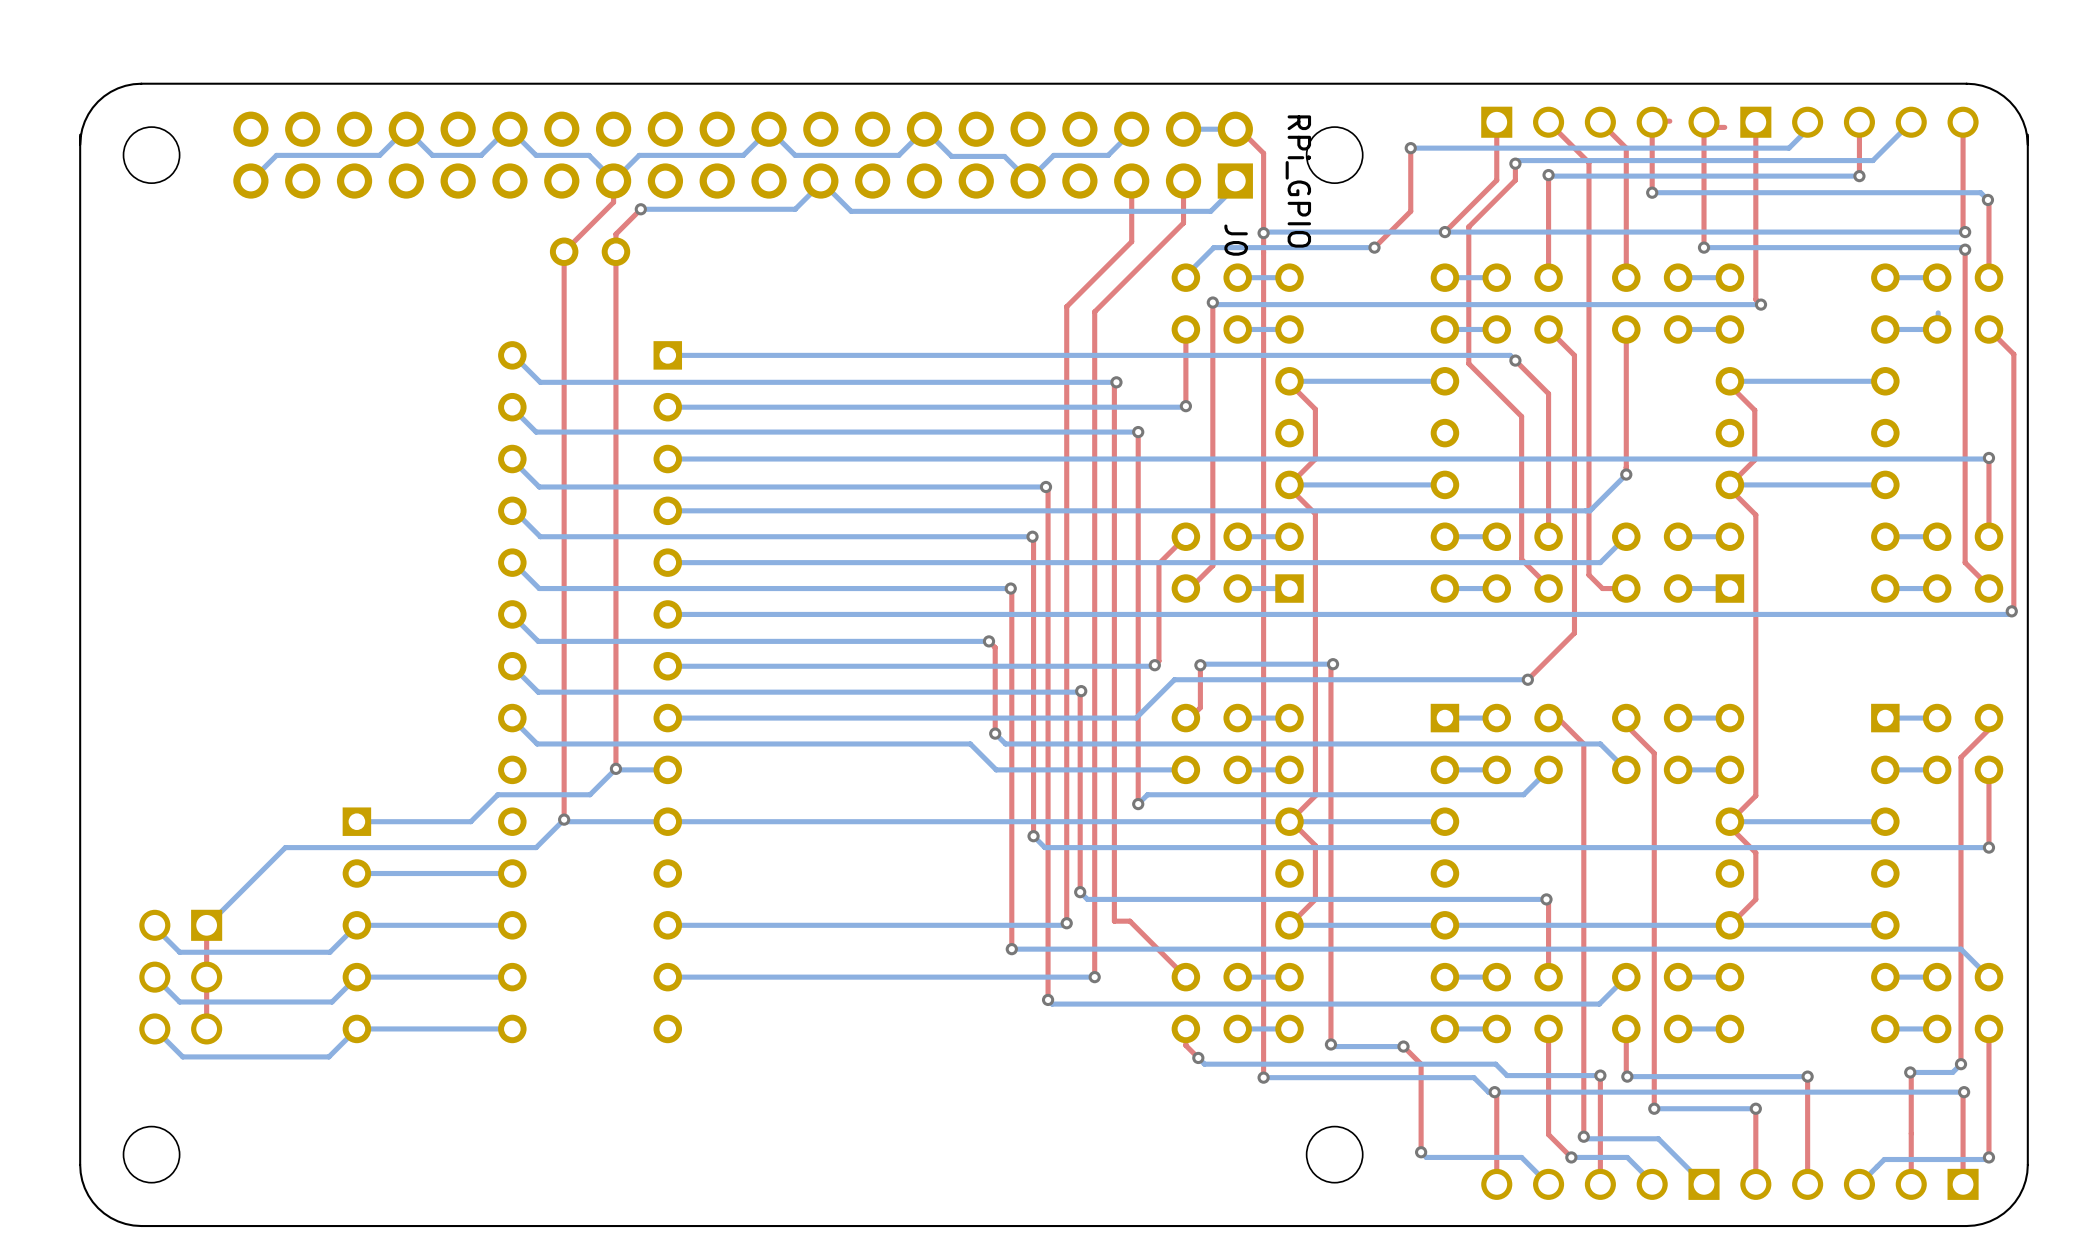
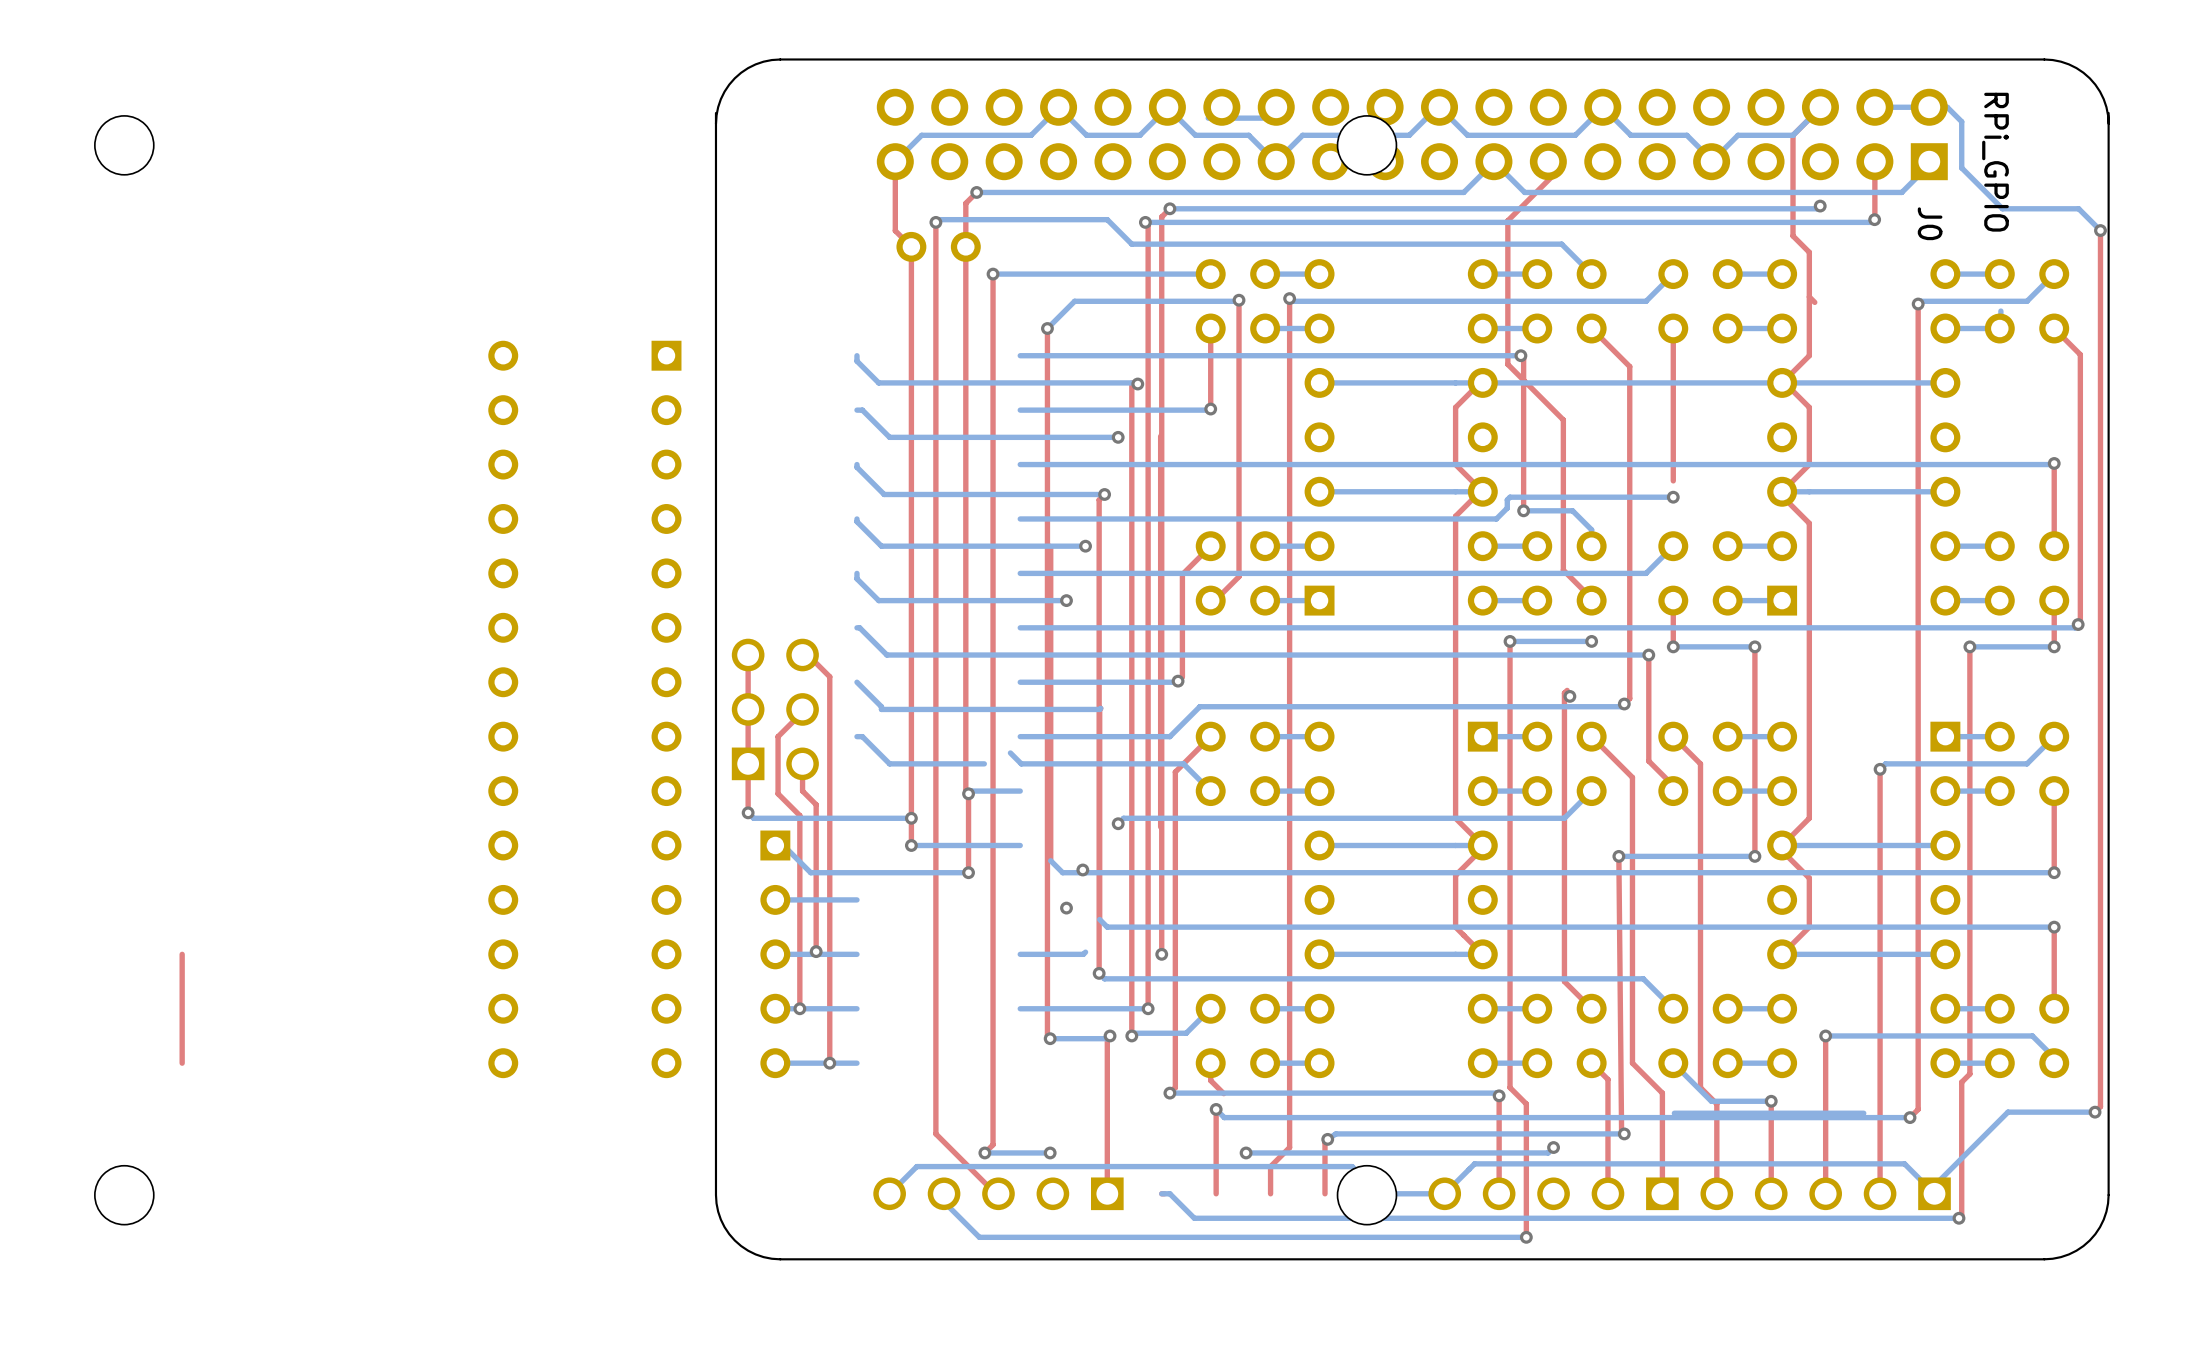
bottom track: none -> (1820, 107) (1793, 135) (1737, 135) (1711, 161) (1686, 135) (1630, 135) (1602, 107) (1575, 135) (1467, 135) (1437, 107) (1409, 135) (1302, 135) (1276, 161) (1248, 135) (1195, 135) (1167, 107) (1139, 135) (1086, 135) (1058, 107) (1031, 135) (921, 135) (895, 161)
bottom track: none -> (1874, 107) (1947, 107) (1961, 121) (1961, 167) (2002, 208) (2078, 208) (2100, 230)
top track: (1669, 121) (1652, 122) (1652, 192) -> none
top track: (1496, 122) (1496, 180) (1444, 232) -> none
top track: (1548, 122) (1588, 162) (1588, 575) (1602, 588) (1626, 588) -> (1673, 646) (1673, 600)
top track: (1600, 122) (1626, 148) (1626, 277) -> none
part: (1600, 122) -> none
top track: (1755, 122) (1755, 256) -> (1820, 107) (1793, 135) (1793, 235) (1809, 252)
bottom track: (1807, 122) (1807, 129) (1788, 148) (1410, 148) -> none
top track: (1859, 122) (1859, 176) -> none
part: (1859, 122) -> none
bottom track: (1911, 122) (1872, 160) (1518, 160) (1515, 163) -> none
top track: (1963, 122) (1963, 230) (1965, 232) -> none
board edge: none -> (2108, 113) (2108, 1195) (2103, 1219) (2089, 1240) (2068, 1254) (2044, 1259) (780, 1259) (763, 1257) (741, 1246) (724, 1227) (718, 1211) (715, 1195) (715, 113)
top track: (1724, 127) (1709, 127) (1704, 122) (1704, 247) -> none
bottom track: (1131, 129) (1131, 131) (1108, 155) (1053, 155) (1028, 181) (1004, 156) (951, 156) (924, 129) (898, 155) (795, 155) (769, 129) (743, 155) (639, 155) (613, 181) (589, 155) (536, 155) (509, 129) (507, 129) (481, 155) (432, 155) (405, 129) (379, 155) (276, 155) (250, 181) -> none
top track: (1235, 129) (1239, 129) (1263, 153) (1263, 1077) -> none
board edge: (2027, 134) (2027, 1164) (2023, 1188) (2009, 1208) (1990, 1221) (1966, 1226) (141, 1226) (125, 1223) (110, 1217) (98, 1208) (88, 1195) (82, 1180) (80, 1164) (80, 134) -> none
board edge: none -> (2108, 123) (2103, 99) (2089, 78) (2068, 64) (2044, 59) (780, 59) (755, 64) (734, 78) (720, 99) (715, 123)
board edge: (2027, 144) (2023, 121) (2009, 101) (1990, 88) (1966, 83) (141, 83) (117, 88) (98, 101) (84, 121) (80, 144) -> none
top track: (1410, 148) (1410, 211) (1374, 247) -> none
via: (1410, 148) -> none
J0 position: (743, 155) -> (1412, 134)
via: (1515, 163) -> none
top track: none -> (895, 161) (895, 230) (911, 246) (911, 845)
top track: none -> (1874, 161) (1874, 219)
bottom track: none -> (1929, 161) (1929, 165) (1901, 192) (1524, 192) (1493, 161) (1463, 192) (976, 192)
top track: (1548, 175) (1548, 277) -> none
bottom track: (1548, 175) (1859, 176) -> none
via: (1548, 175) -> none
via: (1859, 176) -> none
top track: (613, 181) (613, 202) (564, 251) (564, 819) -> none
top track: (1131, 181) (1131, 241) (1066, 306) (1066, 923) -> none
top track: (1183, 181) (1183, 223) (1094, 311) (1094, 977) -> none
bottom track: (1235, 181) (1235, 186) (1210, 211) (851, 211) (820, 181) (820, 183) (795, 209) (640, 209) -> none
bottom track: (1652, 192) (1980, 192) (1987, 199) -> none
via: (1652, 192) -> none
top track: none -> (976, 192) (965, 203) (965, 791) (968, 793) (968, 872)
via: none -> (976, 192)
top track: (1987, 199) (1988, 277) -> none
via: (1987, 199) -> none
top track: (640, 209) (615, 234) (615, 768) -> none
via: (640, 209) -> none
bottom track: none -> (1820, 206) (1817, 208) (1169, 208)
via: none -> (1820, 206)
top track: none -> (1169, 208) (1161, 216) (1161, 954)
via: none -> (1169, 208)
bottom track: none -> (1874, 219) (1871, 222) (1145, 222)
via: none -> (1874, 219)
top track: none -> (935, 222) (935, 1133) (995, 1193) (998, 1193)
bottom track: none -> (935, 222) (938, 219) (1107, 219) (1131, 244) (1561, 244) (1591, 274)
via: none -> (935, 222)
top track: none -> (1145, 222) (1148, 225) (1148, 1008)
via: none -> (1145, 222)
via: (1444, 232) -> none
bottom track: (1965, 232) (1263, 233) -> none
via: (1965, 232) -> none
via: (1263, 233) -> none
top track: none -> (2100, 230) (2100, 1106) (2095, 1112)
via: none -> (2100, 230)
bottom track: (1374, 247) (1213, 247) (1185, 277) -> (993, 274) (1210, 274)
via: (1374, 247) -> none
bottom track: (1704, 247) (1963, 247) (1965, 249) -> none
via: (1704, 247) -> none
top track: (1965, 249) (1965, 562) (1988, 588) -> (2054, 646) (2054, 600)
via: (1965, 249) -> none
part position: (590, 251) -> (938, 246)
top track: none -> (993, 274) (993, 1144) (984, 1152)
via: none -> (993, 274)
bottom track: none -> (1673, 274) (1646, 301) (1292, 301) (1289, 298)
bottom track: none -> (2054, 274) (2027, 301) (1920, 301) (1918, 304)
top track: none -> (1289, 298) (1289, 1147) (1270, 1166) (1270, 1193)
via: none -> (1289, 298)
bottom track: (1212, 302) (1214, 304) (1761, 304) -> none
bottom track: none -> (1240, 301) (1074, 301) (1047, 328)
via: (1761, 304) -> none
top track: none -> (1918, 304) (1918, 1109) (1910, 1117)
via: none -> (1918, 304)
top track: none -> (1047, 328) (1047, 1035) (1050, 1038)
via: none -> (1047, 328)
bottom track: (512, 355) (540, 382) (1116, 382) -> none
bottom track: none -> (856, 355) (856, 361) (878, 382) (1131, 382)
bottom track: (1004, 355) (667, 355) -> none
top track: none -> (1520, 355) (1523, 358) (1523, 510)
bottom track: (1481, 355) (1510, 355) (1515, 360) -> none
top track: (1574, 355) (1574, 633) (1527, 679) -> (1618, 355) (1629, 366) (1629, 698) (1624, 704)
top track: (1515, 360) (1548, 393) (1548, 536) -> none
via position: (1515, 360) -> (1520, 355)
top track: none -> (1131, 382) (1131, 1035)
top track: (1289, 381) (1315, 409) (1315, 459) (1289, 484) (1289, 488) (1315, 513) (1315, 795) (1289, 821) (1315, 845) (1315, 899) (1289, 925) -> none
top track: none -> (1482, 382) (1480, 382) (1455, 407) (1455, 464) (1482, 491) (1480, 491) (1455, 516) (1455, 818) (1482, 845) (1482, 848) (1455, 875) (1455, 927) (1482, 954)
top track: (1729, 381) (1729, 385) (1754, 410) (1754, 460) -> (1809, 296) (1809, 355) (1782, 382) (1784, 382) (1809, 407) (1808, 465)
bottom track: none -> (1782, 382) (1482, 382)
top track: (1116, 382) (1114, 384) (1114, 921) (1129, 921) (1185, 977) -> none
bottom track: (512, 407) (536, 432) (1138, 432) -> none
bottom track: (849, 407) (667, 407) -> none
bottom track: (1004, 407) (854, 407) -> (1118, 437) (889, 437) (862, 410)
via: (1138, 432) -> none
via: none -> (1118, 437)
bottom track: (512, 459) (539, 486) (1045, 486) -> none
bottom track: none -> (856, 464) (856, 467) (884, 494) (1104, 494)
bottom track: (1004, 459) (667, 459) -> none
bottom track: (1626, 474) (1590, 510) (1457, 510) -> (1673, 497) (1510, 497) (1507, 499) (1507, 508) (1496, 518)
via position: (1626, 474) -> (1673, 497)
top track: (1045, 486) (1048, 489) (1048, 999) -> none
via: (1045, 486) -> none
top track: none -> (1104, 494) (1099, 499) (1099, 973)
via: none -> (1104, 494)
bottom track: none -> (1523, 510) (1572, 510) (1591, 529) (1591, 546)
via: none -> (1523, 510)
bottom track: (512, 510) (540, 536) (872, 536) -> (856, 518) (856, 521) (881, 546)
bottom track: (1004, 510) (667, 510) -> none
via: (1032, 536) -> none
bottom track: none -> (1085, 546) (1049, 546)
via: none -> (1085, 546)
bottom track: (512, 562) (539, 588) (869, 588) -> (856, 573) (856, 578) (878, 600)
bottom track: (1004, 562) (667, 562) -> none
top track: (1010, 588) (1011, 949) -> none
via: (1010, 588) -> none
bottom track: none -> (1066, 600) (1026, 600)
via: none -> (1066, 600)
bottom track: (512, 614) (538, 641) (989, 641) -> none
bottom track: (849, 614) (667, 614) -> none
bottom track: (1004, 614) (851, 614) -> (1648, 655) (886, 655) (859, 627)
top track: none -> (1510, 641) (1510, 1087) (1526, 1103) (1526, 1237)
via: none -> (1510, 641)
bottom track: none -> (1591, 641) (1510, 641)
via: none -> (1591, 641)
via: none -> (1673, 646)
top track: none -> (1754, 646) (1754, 856)
bottom track: none -> (1754, 646) (1673, 646)
via: none -> (1754, 646)
top track: none -> (1969, 646) (1969, 1074) (1961, 1082) (1961, 1215) (1958, 1218)
via: none -> (1969, 646)
bottom track: none -> (2054, 646) (1969, 646)
via: none -> (2054, 646)
top track: none -> (748, 655) (748, 812)
top track: none -> (802, 655) (808, 655) (829, 676) (829, 1063)
top track: none -> (1648, 655) (1648, 761) (1673, 785) (1673, 791)
via: none -> (1648, 655)
top track: (989, 641) (995, 647) (995, 733) -> none
via: (989, 641) -> none
top track: (1333, 664) (1330, 666) (1330, 1044) -> none
bottom track: (1333, 664) (1200, 665) -> none
via: (1333, 664) -> none
top track: (1200, 665) (1200, 707) (1190, 718) (1185, 718) -> (1169, 1093) (1175, 1087) (1175, 772) (1210, 736)
via: (1200, 665) -> none
bottom track: (512, 666) (538, 692) (872, 692) -> (856, 682) (881, 706) (881, 709)
bottom track: (1004, 666) (667, 666) -> none
bottom track: (1527, 679) (1174, 679) (1136, 718) -> (1624, 704) (1621, 706) (1199, 706) (1169, 736) (1158, 736)
via: none -> (1624, 704)
via: (1081, 691) -> none
part: none -> (775, 709)
top track: none -> (802, 709) (802, 712) (778, 736) (778, 793) (799, 815) (799, 1008)
bottom track: (512, 718) (537, 743) (880, 743) -> none
bottom track: (849, 718) (667, 718) -> none
bottom track: (1004, 718) (854, 718) -> (889, 763) (862, 736)
top track: (1548, 718) (1557, 718) (1583, 743) (1583, 1136) -> (1591, 736) (1632, 777) (1632, 1063) (1662, 1093) (1662, 1193)
top track: (1626, 718) (1626, 725) (1654, 753) (1654, 1108) -> (1673, 736) (1700, 763) (1700, 1087) (1716, 1103) (1716, 1193)
top track: (1988, 718) (1988, 729) (1960, 757) (1960, 1064) -> none
bottom track: none -> (2054, 736) (2027, 763) (1885, 763) (1880, 769)
via: (995, 733) -> none
top track: none -> (802, 763) (802, 791) (816, 804) (816, 951)
bottom track: (970, 743) (996, 769) -> (968, 793) (971, 791) (1011, 791)
bottom track: (1159, 743) (1600, 743) (1626, 769) -> none
top track: none -> (1880, 769) (1880, 1193)
via: none -> (1880, 769)
via: (615, 768) -> none
bottom track: (667, 769) (615, 768) (590, 794) (497, 794) (470, 821) (356, 821) -> none
bottom track: (1185, 769) (1004, 769) -> (1210, 791) (1183, 763)
via: none -> (968, 793)
bottom track: none -> (748, 812) (753, 818) (911, 818)
via: none -> (748, 812)
bottom track: (1523, 794) (1147, 794) (1138, 804) -> (1565, 817) (1123, 818) (1118, 823)
via: none -> (911, 818)
via: none -> (1118, 823)
via: (1138, 804) -> none
via: (564, 819) -> none
bottom track: (771, 821) (566, 821) (564, 819) (536, 847) (285, 847) (206, 925) -> none
bottom track: (900, 821) (779, 821) -> (968, 872) (810, 872) (783, 845)
via: none -> (911, 845)
bottom track: (1289, 821) (1004, 821) -> none
top track: none -> (1618, 856) (1621, 1131) (1624, 1133)
bottom track: none -> (1754, 856) (1618, 856)
via: none -> (1754, 856)
via: (1033, 836) -> none
via: none -> (1082, 869)
via: none -> (968, 872)
bottom track: (512, 873) (356, 873) -> none
bottom track: none -> (856, 899) (775, 899)
via: none -> (1066, 908)
via: (1080, 892) -> none
top track: (1546, 899) (1548, 901) (1548, 977) -> (1567, 690) (1564, 693) (1564, 981) (1591, 1008)
via position: (1546, 899) -> (1618, 856)
top track: none -> (2054, 927) (2054, 1008)
bottom track: none -> (2054, 927) (1589, 927)
via: none -> (2054, 927)
via: none -> (816, 951)
via: (1066, 923) -> none
part position: (356, 925) -> (775, 954)
bottom track: (512, 925) (356, 925) (329, 952) (179, 952) (154, 925) -> none
bottom track: (771, 925) (667, 925) -> none
bottom track: (1004, 925) (849, 925) -> none
via: none -> (1161, 954)
bottom track: (1729, 925) (1444, 925) -> none
via: none -> (1099, 973)
via: (1011, 949) -> none
bottom track: (1011, 950) (1960, 949) (1988, 977) -> none
part: (180, 977) -> none
bottom track: (512, 977) (356, 977) (332, 1002) (179, 1002) (154, 977) -> none
bottom track: (771, 977) (667, 977) -> none
via: none -> (799, 1008)
bottom track: (1004, 977) (849, 977) -> none
via: (1094, 977) -> none
bottom track: none -> (1148, 1008) (1114, 1008)
via: none -> (1148, 1008)
bottom track: none -> (1210, 1008) (1186, 1033) (1134, 1033) (1131, 1035)
bottom track: (1626, 977) (1599, 1004) (1052, 1004) (1048, 999) -> (1673, 1008) (1643, 978) (1104, 978) (1099, 973)
via position: (1048, 999) -> (1050, 1038)
top track: none -> (1110, 1035) (1107, 1038) (1107, 1193)
bottom track: none -> (1110, 1035) (1107, 1038) (1050, 1038)
via: none -> (1110, 1035)
via: none -> (1131, 1035)
top track: none -> (1825, 1035) (1825, 1193)
bottom track: none -> (1825, 1035) (2032, 1035) (2054, 1057) (2054, 1063)
via: none -> (1825, 1035)
bottom track: (512, 1028) (356, 1028) (328, 1056) (182, 1056) (154, 1028) -> none
via: none -> (829, 1063)
bottom track: none -> (856, 1063) (775, 1063)
top track: (1548, 1028) (1548, 1134) (1571, 1157) -> (1591, 1063) (1607, 1079) (1607, 1193)
top track: (1626, 1028) (1627, 1076) -> none
bottom track: none -> (1673, 1063) (1711, 1101) (1771, 1101)
top track: (1988, 1028) (1988, 1157) -> none
bottom track: (1330, 1044) (1333, 1046) (1403, 1046) -> none
via: (1330, 1044) -> none
top track: (1403, 1046) (1421, 1064) (1421, 1152) -> none
via: (1403, 1046) -> none
bottom track: none -> (1169, 1093) (1496, 1093) (1499, 1095)
via: none -> (1169, 1093)
bottom track: (1198, 1057) (1204, 1064) (1495, 1064) (1507, 1075) (1600, 1075) -> none
via position: (1198, 1057) -> (1216, 1109)
top track: none -> (1499, 1095) (1499, 1193)
via: none -> (1499, 1095)
bottom track: (1960, 1064) (1952, 1072) (1910, 1072) -> none
via: (1960, 1064) -> none
top track: none -> (1771, 1101) (1771, 1193)
via: none -> (1771, 1101)
top track: none -> (1216, 1109) (1216, 1193)
bottom track: none -> (1216, 1109) (1224, 1117) (1910, 1117)
top track: (1910, 1072) (1911, 1184) -> none
via: (1910, 1072) -> none
top track: (1600, 1075) (1600, 1184) -> none
via: (1600, 1075) -> none
bottom track: none -> (2095, 1112) (2007, 1112) (1934, 1185) (1934, 1193) (1904, 1163) (1474, 1163) (1444, 1193) (1382, 1193) (1379, 1191) (1379, 1193) (1352, 1166) (916, 1166) (889, 1193)
via: none -> (2095, 1112)
via: (1627, 1076) -> none
top track: (1807, 1076) (1807, 1184) -> none
via: (1807, 1076) -> none
bottom track: (1263, 1077) (1473, 1077) (1488, 1092) (1964, 1092) -> none
via: (1263, 1077) -> none
via: none -> (1910, 1117)
top track: (1494, 1092) (1496, 1094) (1496, 1184) -> none
via: (1494, 1092) -> none
top track: (1964, 1092) (1963, 1184) -> none
via: (1964, 1092) -> none
bottom track: none -> (1624, 1133) (1335, 1133) (1327, 1139)
via: none -> (1624, 1133)
top track: none -> (1327, 1139) (1324, 1142) (1324, 1193)
via: none -> (1327, 1139)
via: (1654, 1108) -> none
top track: (1755, 1108) (1755, 1184) -> none
bottom track: (1755, 1108) (1654, 1108) -> none
via: (1755, 1108) -> none
bottom track: none -> (1553, 1147) (1548, 1152) (1246, 1152)
via: none -> (1553, 1147)
via: none -> (984, 1152)
bottom track: none -> (1050, 1152) (984, 1152)
via: none -> (1050, 1152)
via: none -> (1246, 1152)
bottom track: (1583, 1136) (1585, 1138) (1658, 1138) (1704, 1184) -> none
via: (1583, 1136) -> none
bottom track: (1421, 1152) (1426, 1157) (1521, 1157) (1548, 1184) -> none
via: (1421, 1152) -> none
bottom track: none -> (944, 1193) (944, 1201) (979, 1237) (1526, 1237)
part: none -> (998, 1193)
bottom track: none -> (1161, 1193) (1169, 1193) (1194, 1218) (1958, 1218)
part: none -> (1553, 1193)
part: none -> (1825, 1193)
bottom track: (1571, 1157) (1627, 1157) (1652, 1184) -> none
via: (1571, 1157) -> none
bottom track: (1988, 1157) (1986, 1159) (1884, 1159) (1859, 1184) -> none
via: (1988, 1157) -> none
via: none -> (1958, 1218)
part: (1600, 1184) -> none
part: (1859, 1184) -> none
via: none -> (1526, 1237)

